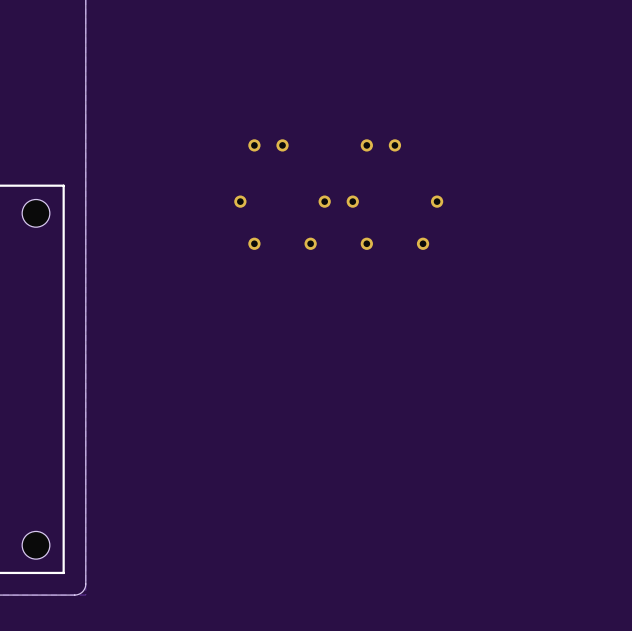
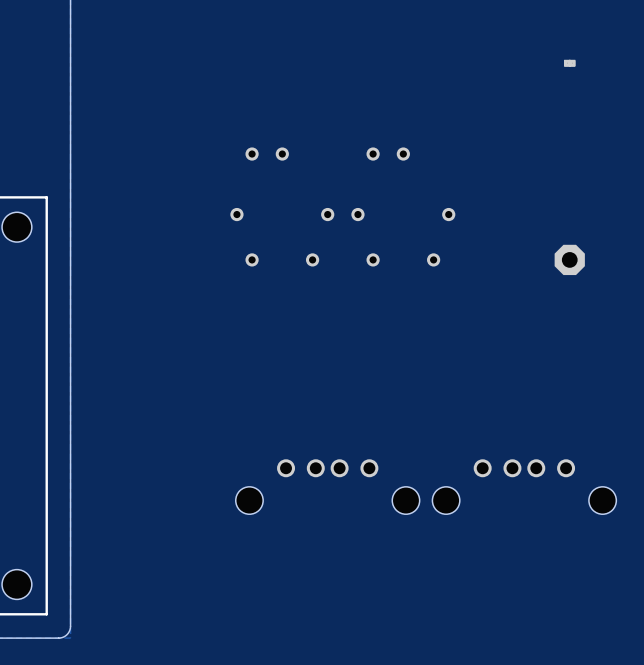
part: none -> (569, 63)
part: none -> (569, 259)
part: none -> (327, 486)
part: none -> (524, 486)

